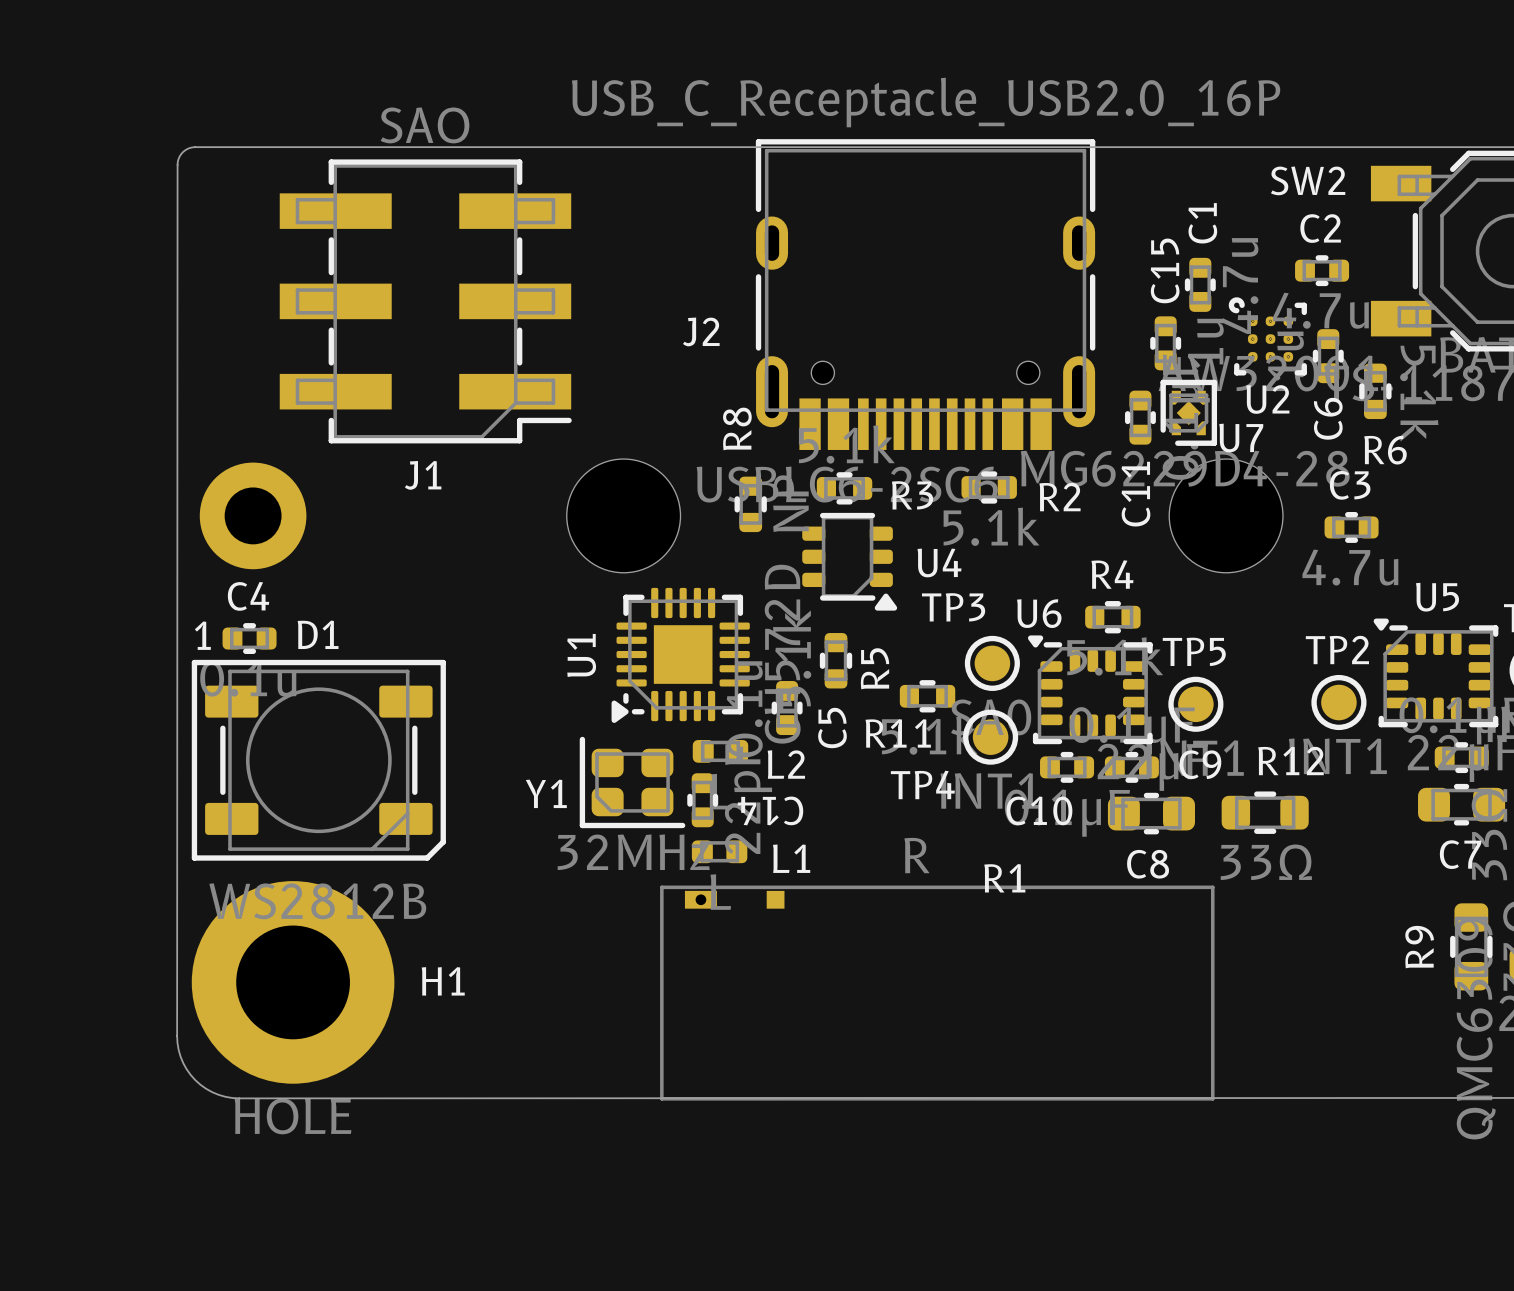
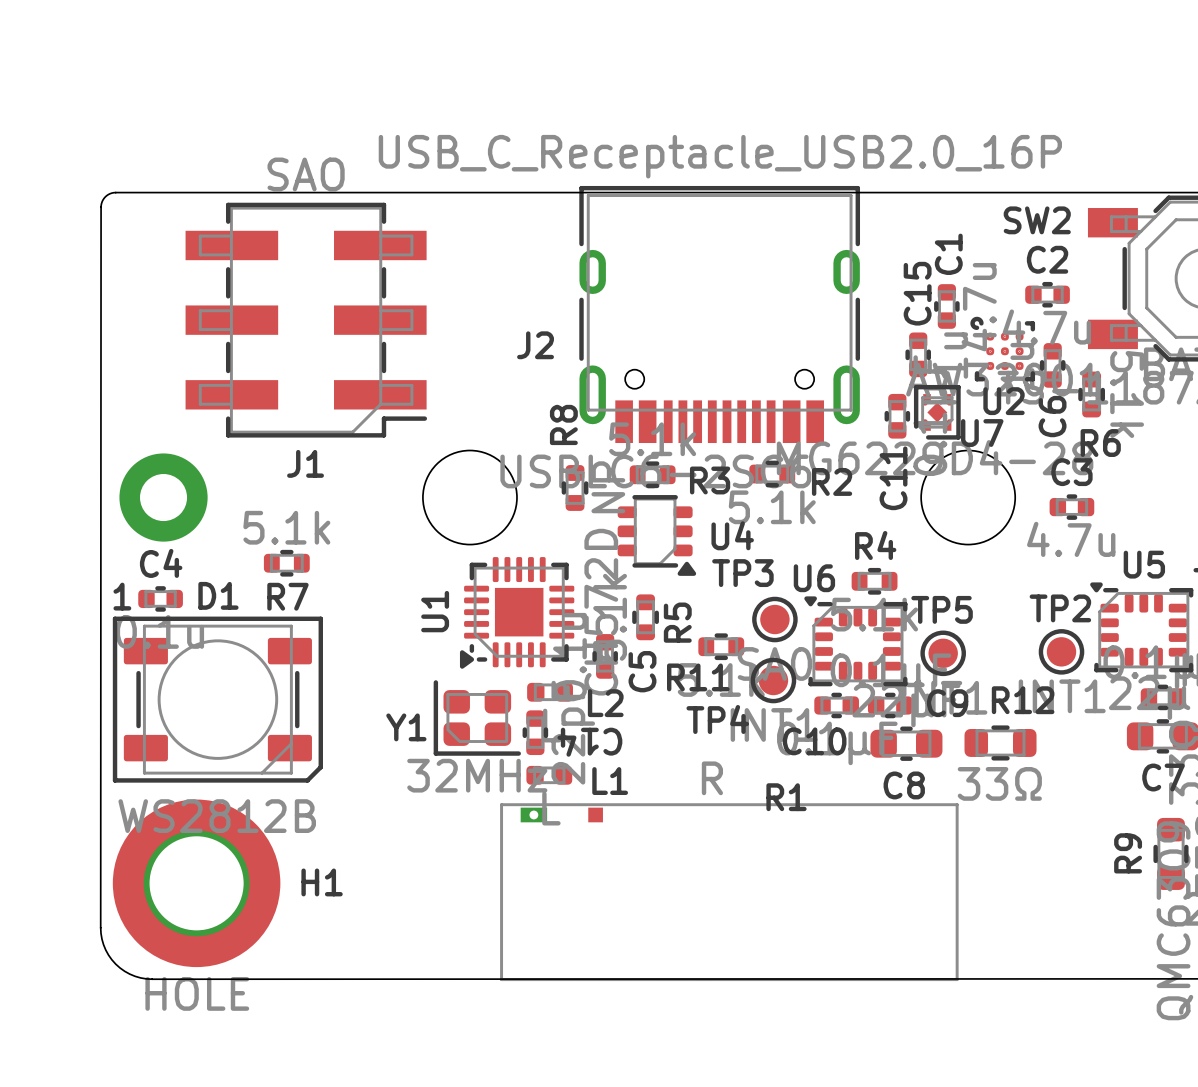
R7: none -> 5.1k (286, 563)

